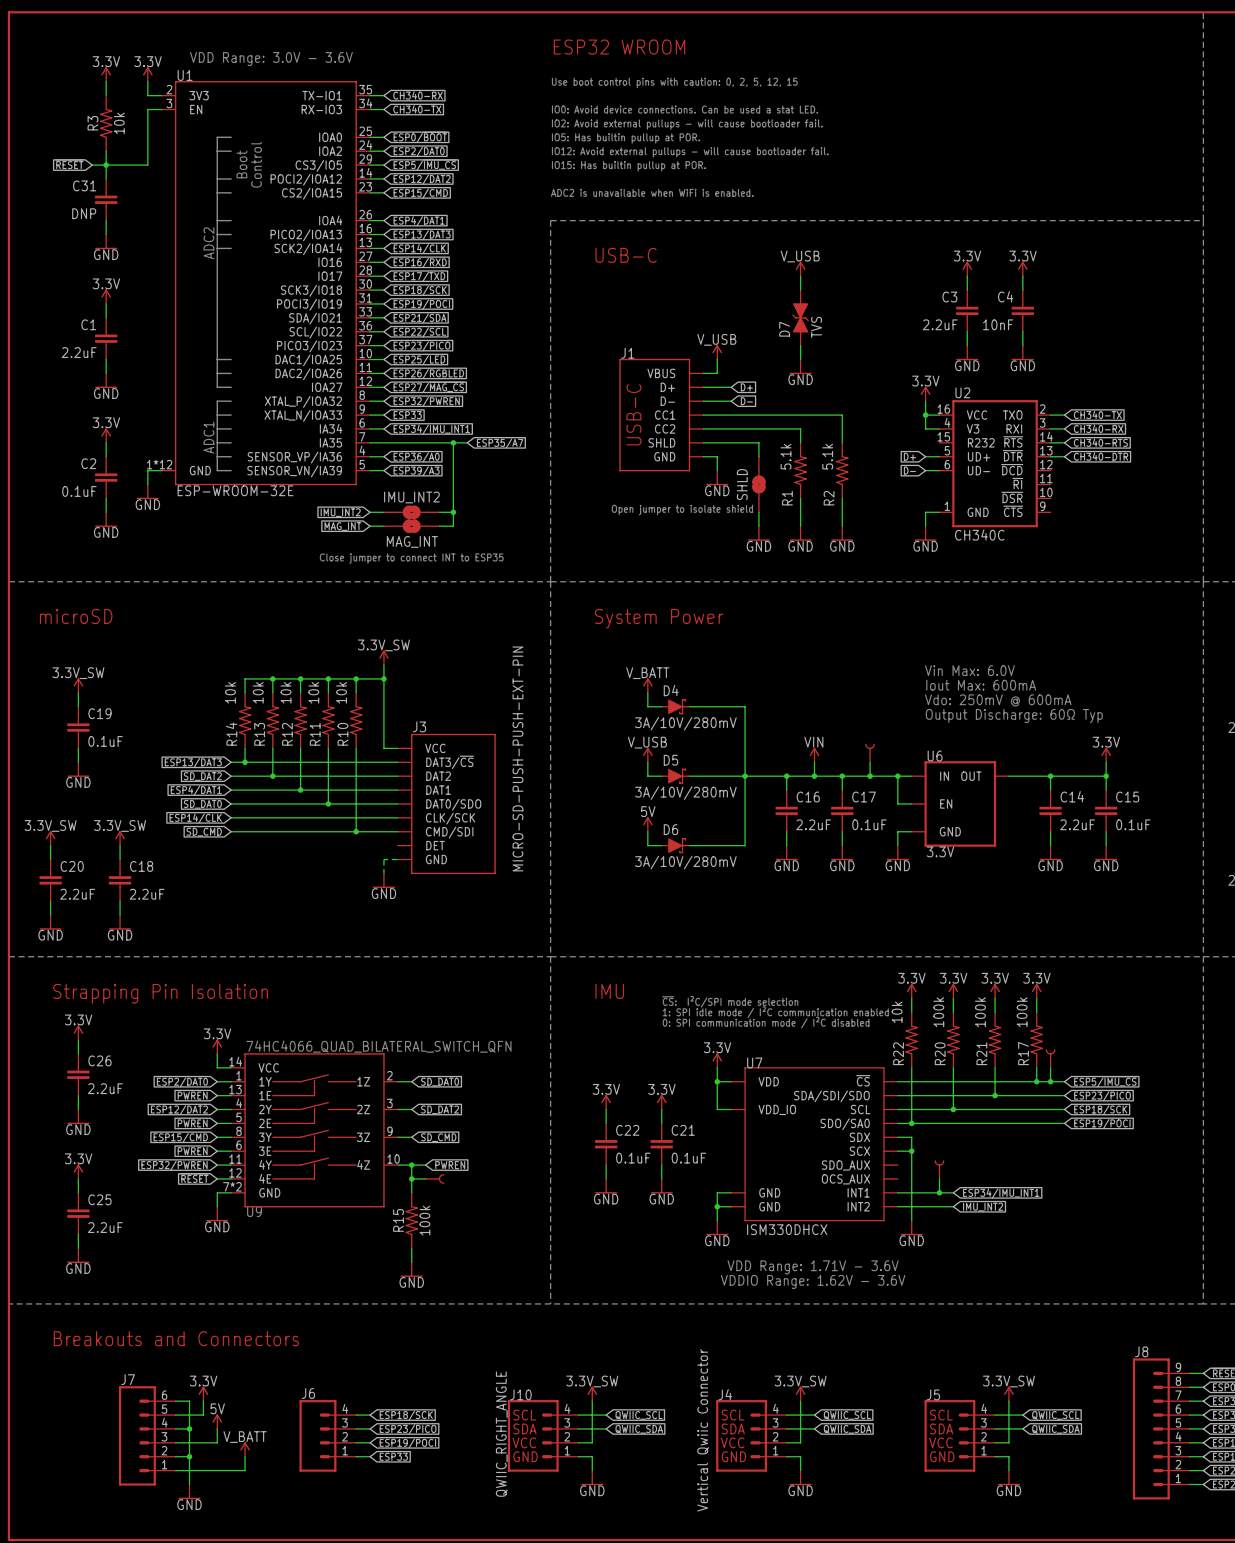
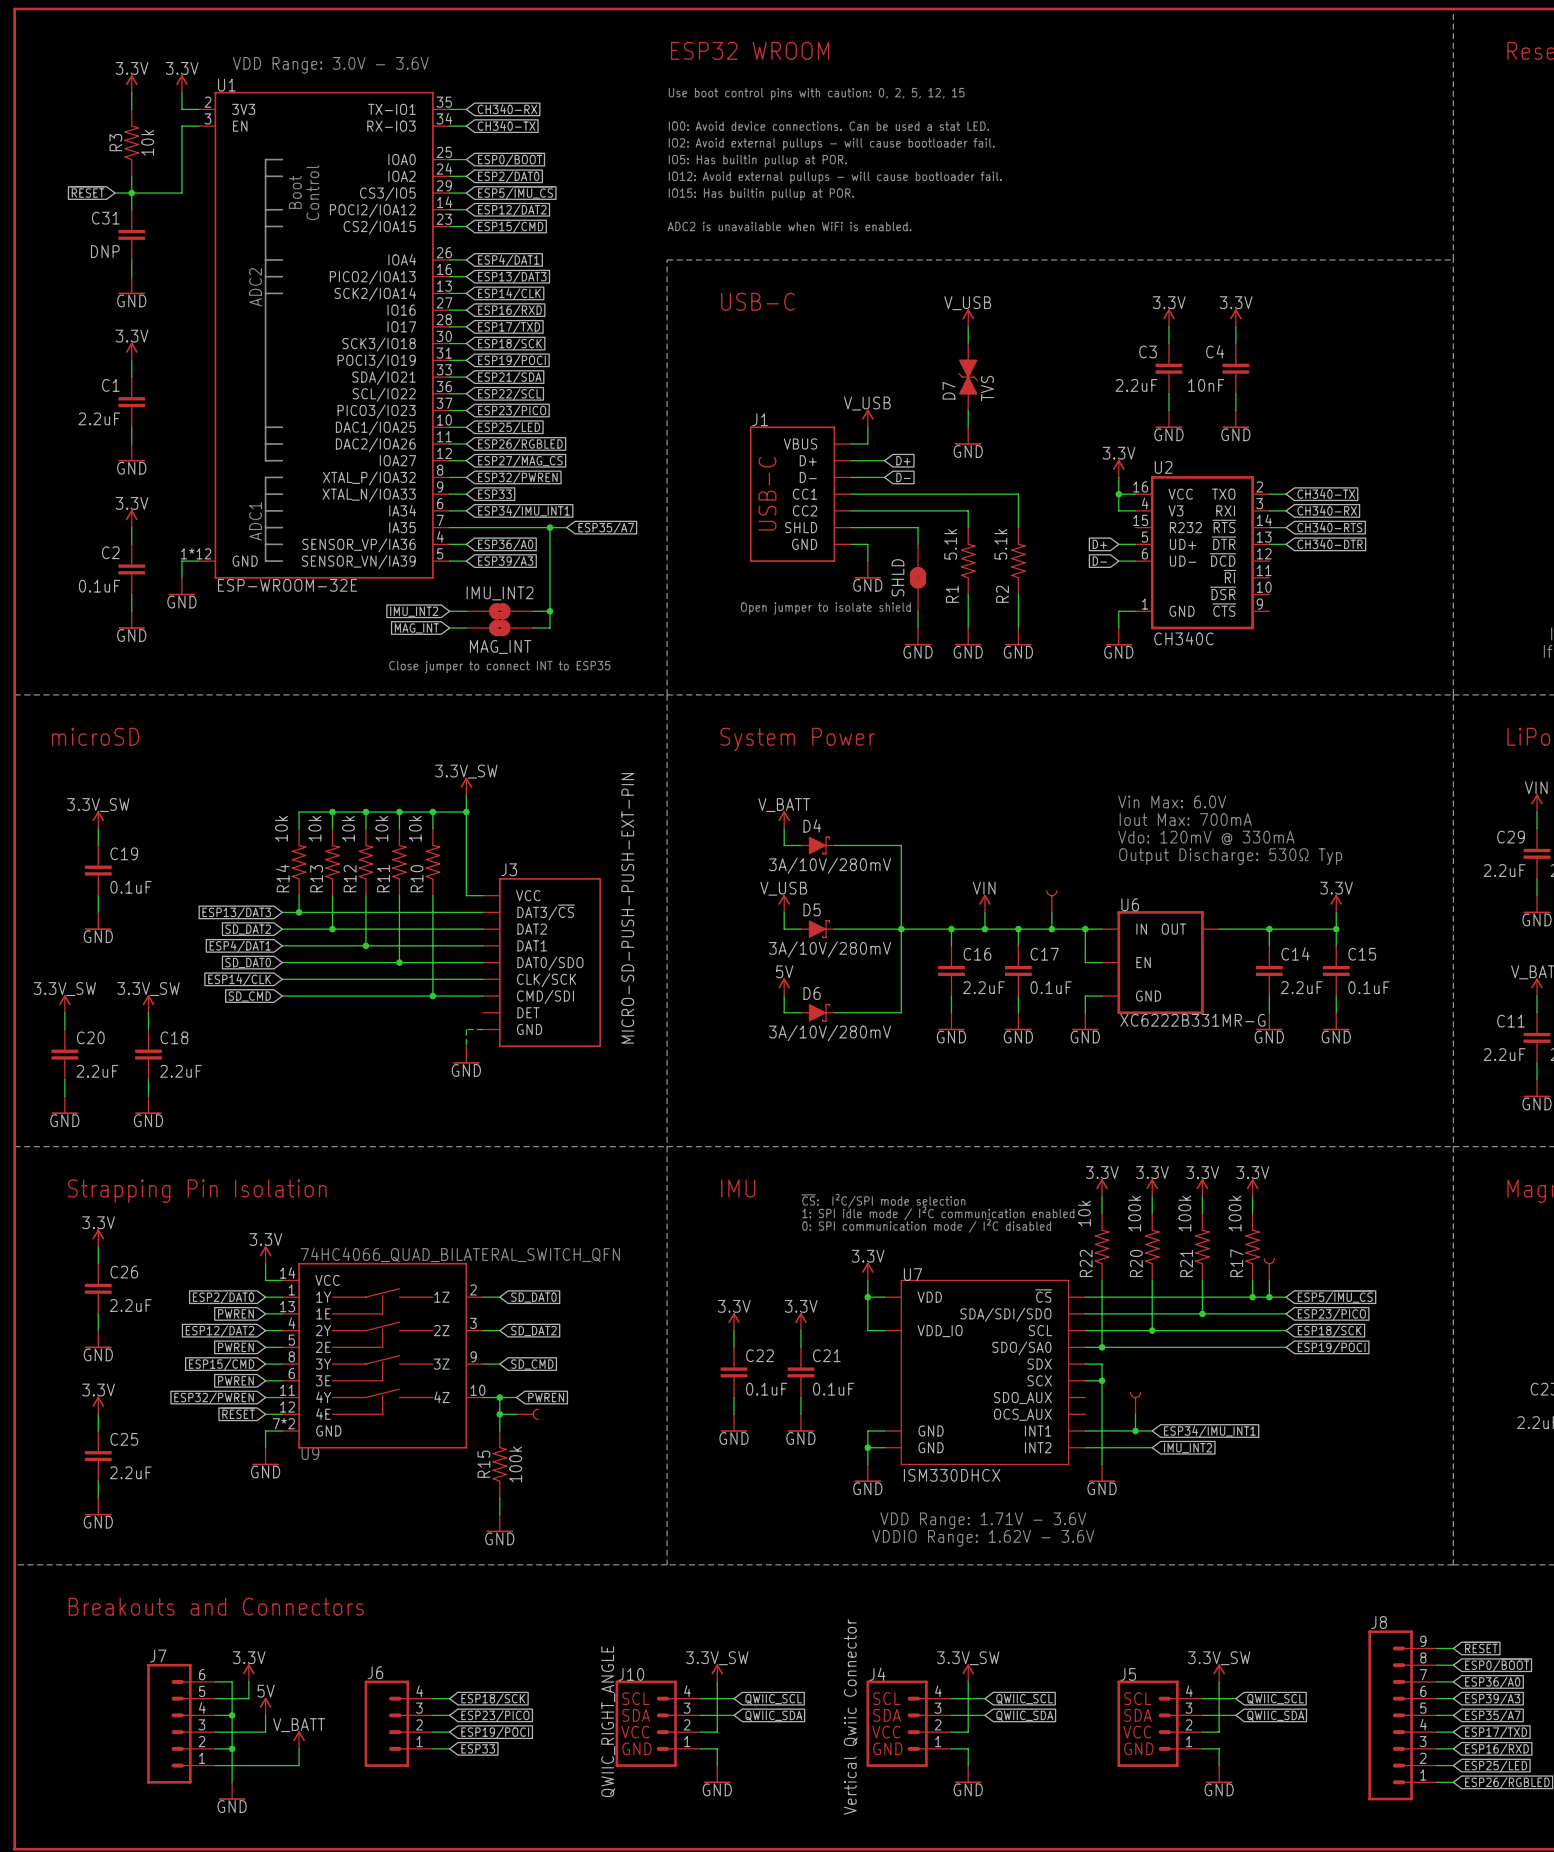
text: Iout Max: 600mA (981, 685) -> Iout Max: 700mA (1185, 819)
text: Vdo: 250mV @ 600mA (998, 700) -> Vdo: 120mV @ 330mA (1206, 837)
text: Output Discharge: 60Ω Typ (1014, 716) -> Output Discharge: 530Ω Typ (1230, 856)
U6 value: 3.3V (940, 851) -> XC6222B331MR-G (1192, 1020)

